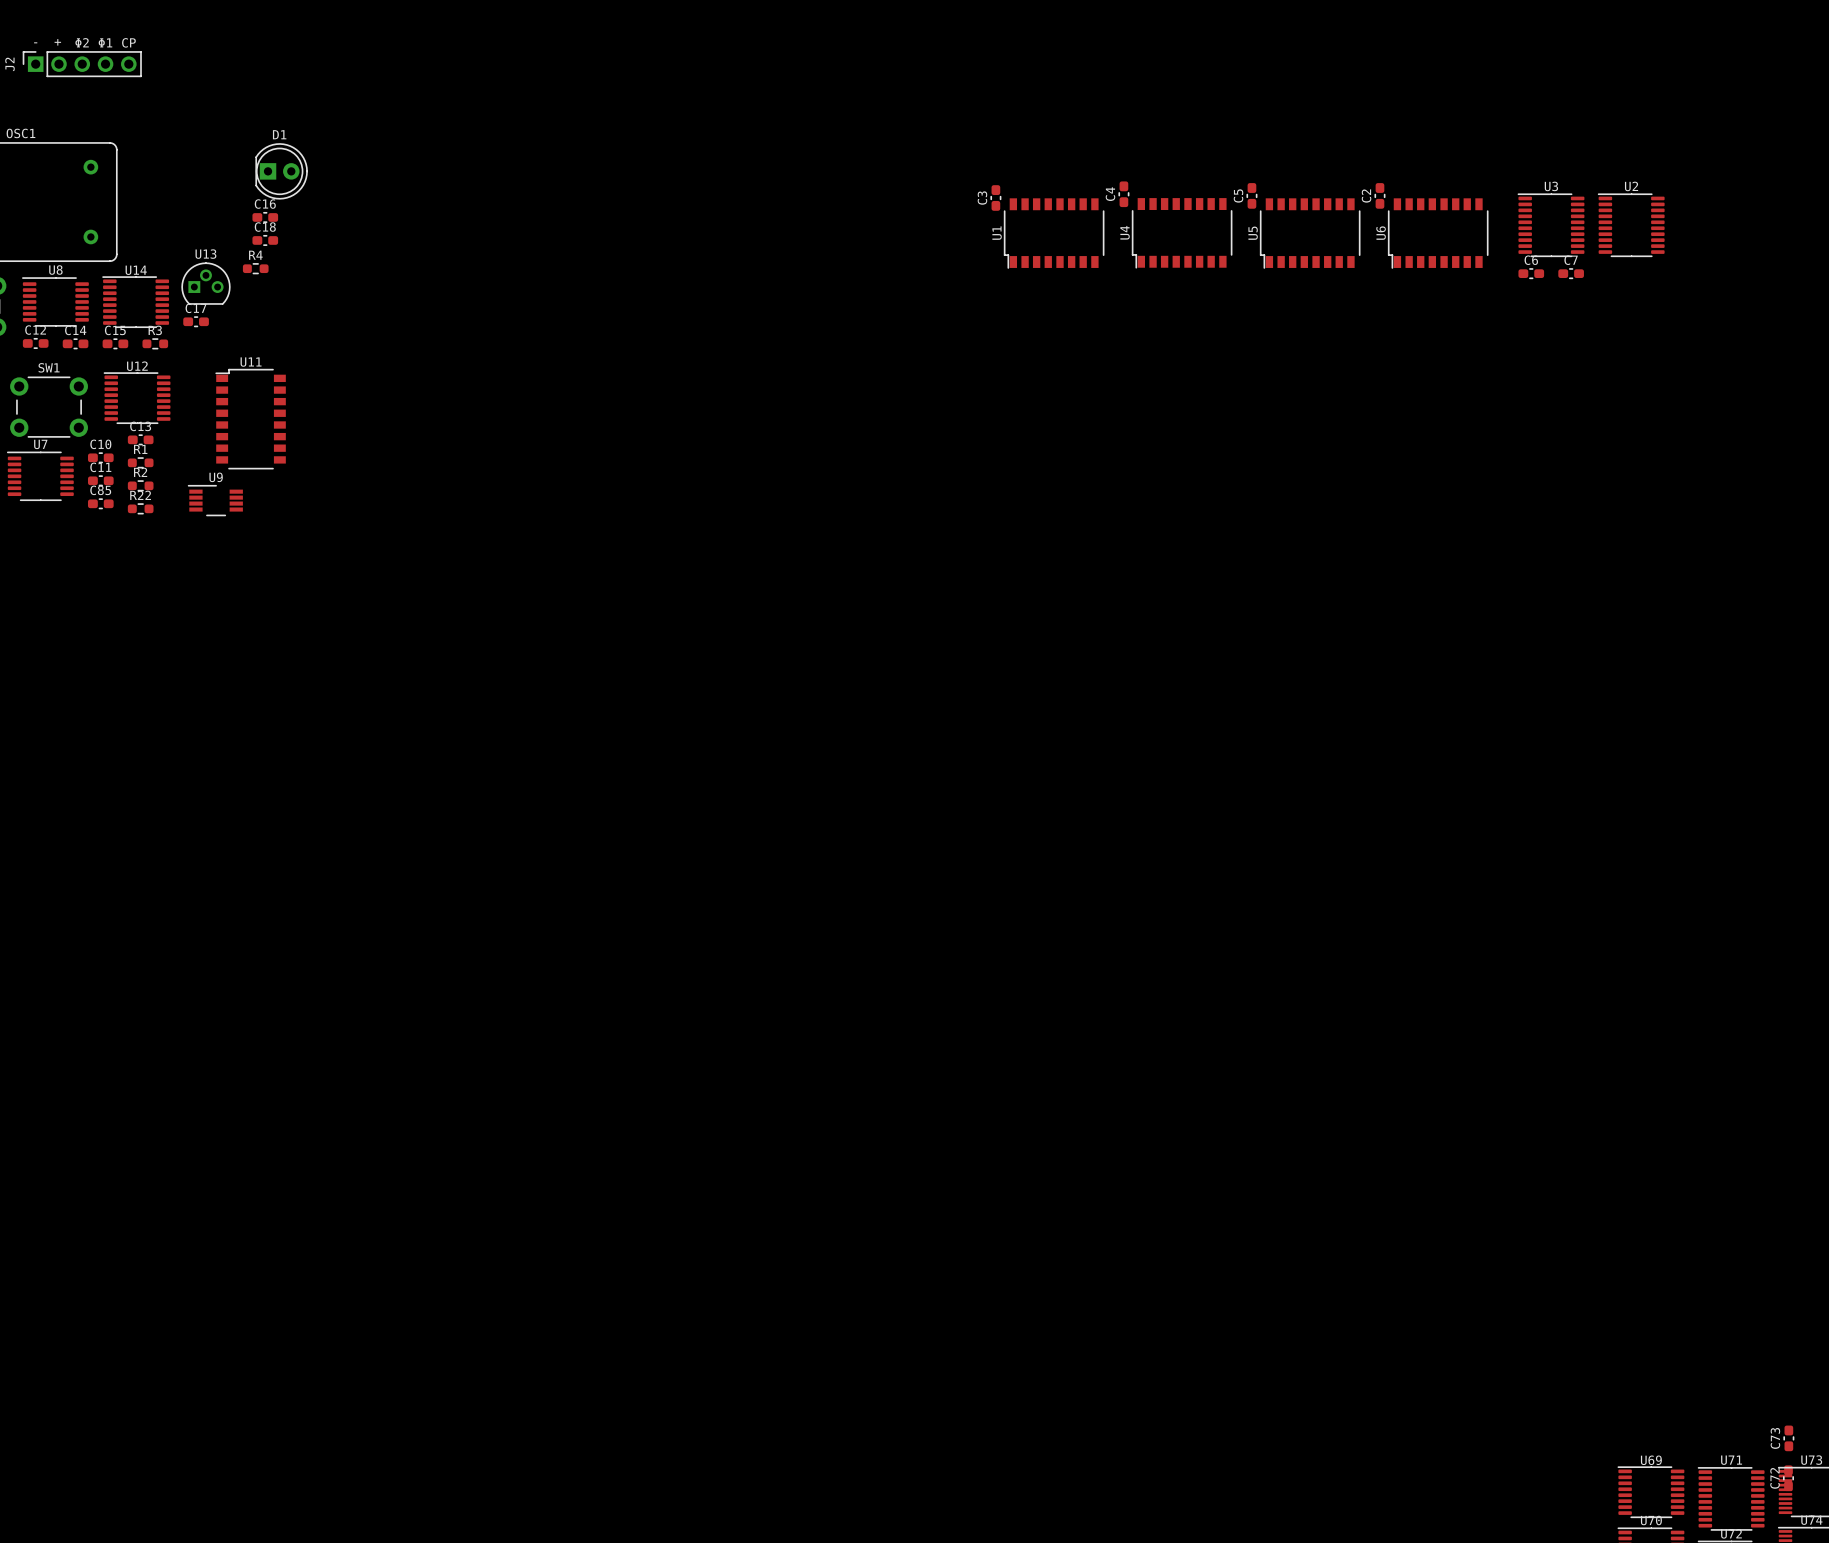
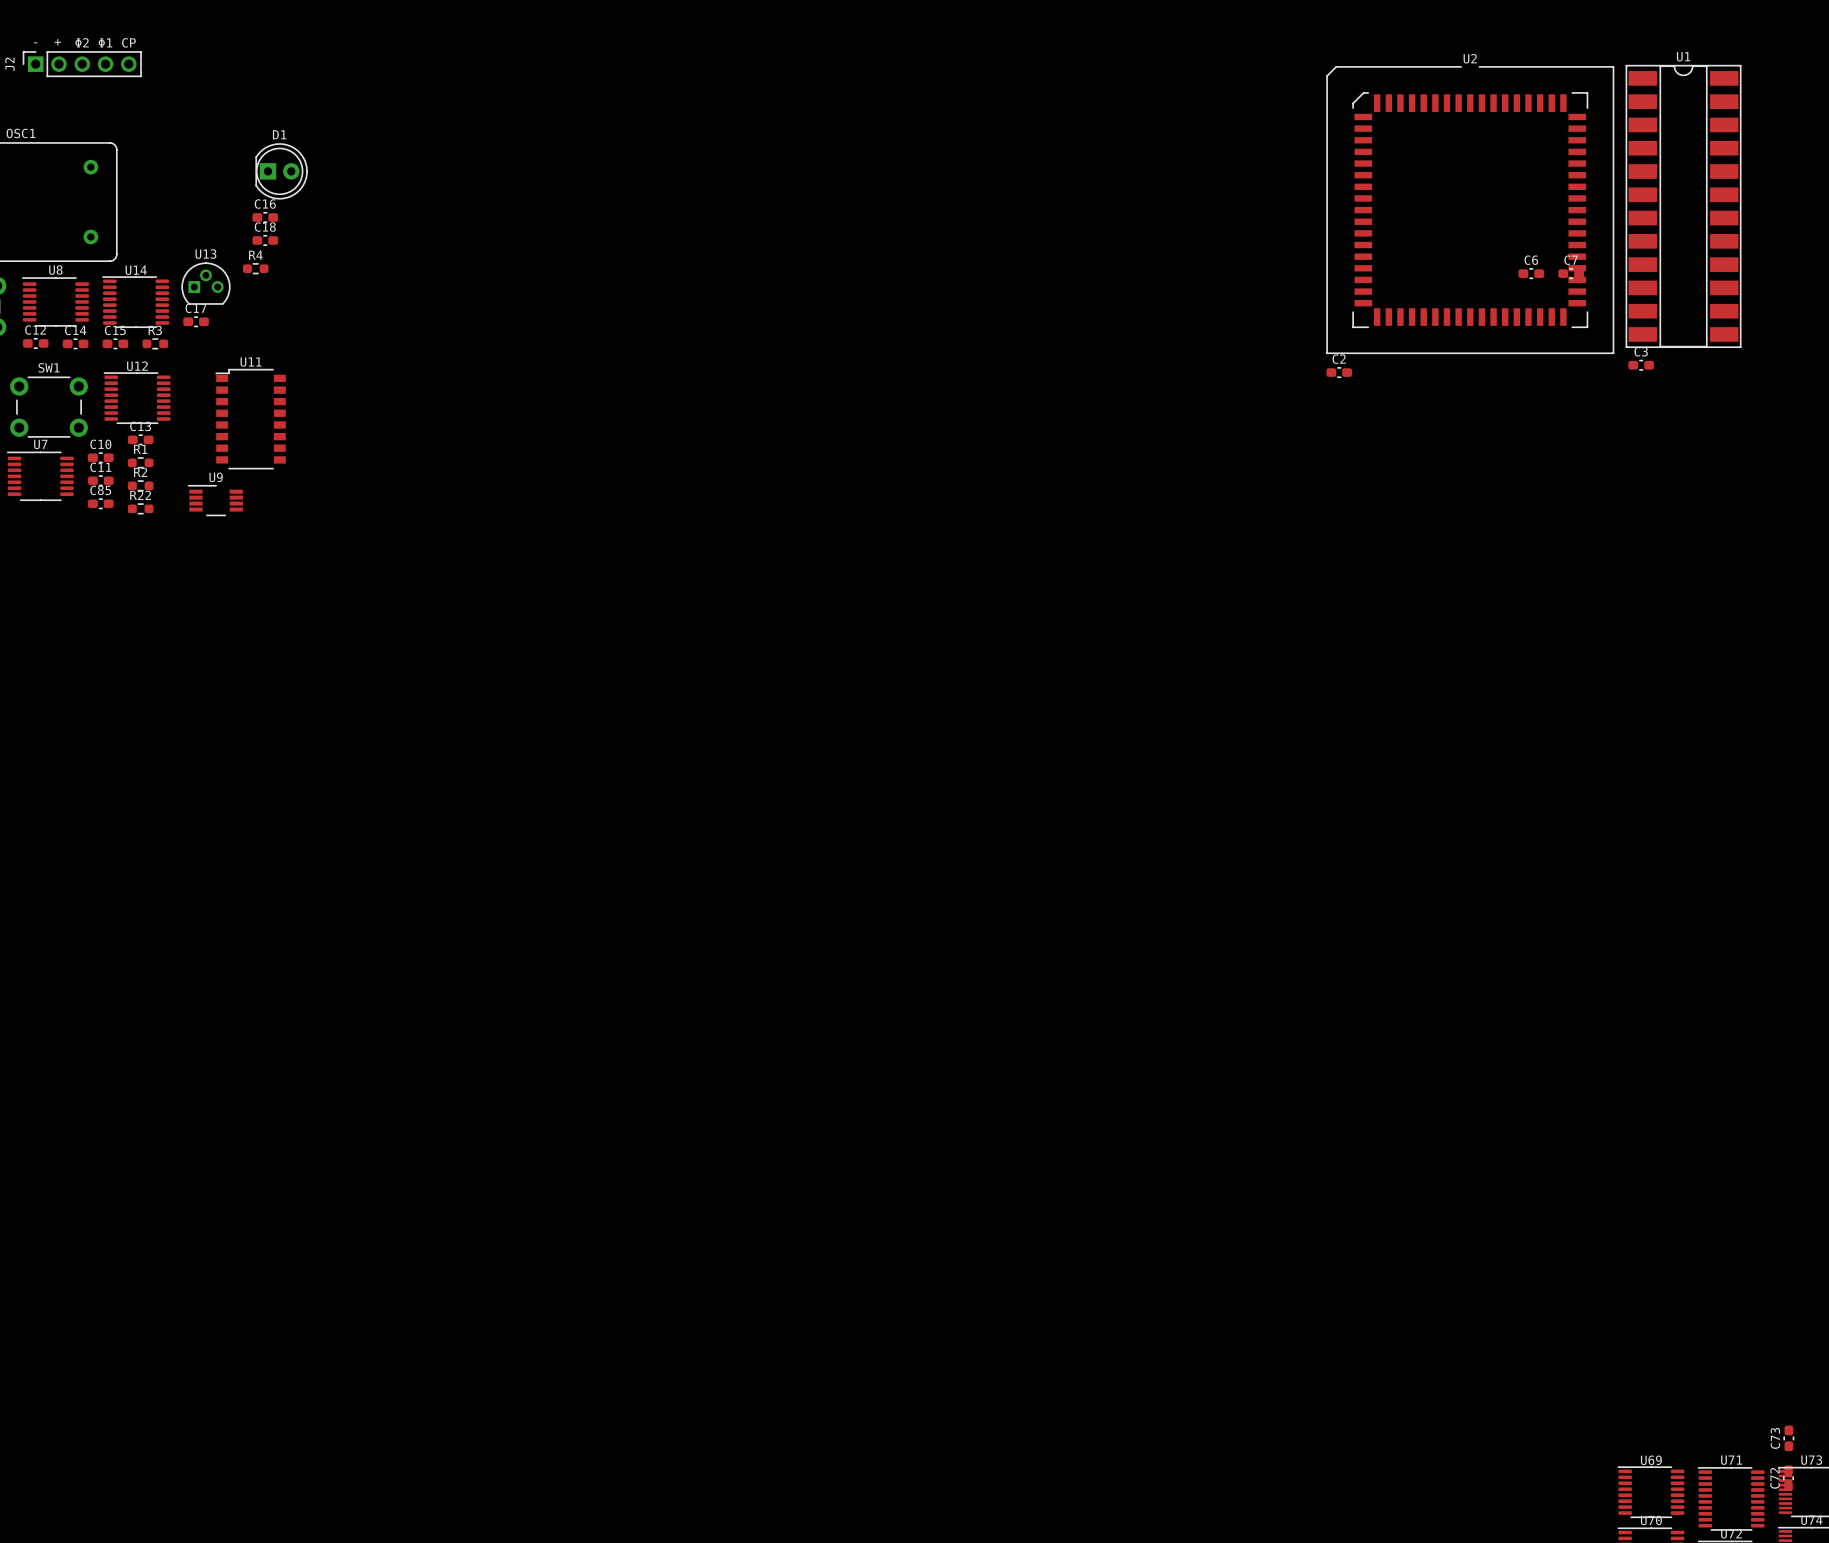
U2 name position: U2 (1631, 186) -> U2 (1470, 58)
U2 footprint: [1598, 193, 1665, 257] -> [1326, 66, 1615, 354]
C4: (1123, 194) -> none
C5: (1251, 195) -> none
C2 rotation: 0° (1379, 195) -> 90° clockwise (1339, 372)
C2 position: (1379, 195) -> (1339, 372)
C3 rotation: 0° (995, 197) -> 90° clockwise (1641, 365)
C3 position: (995, 197) -> (1641, 365)
U1 footprint: [1004, 198, 1105, 269] -> [1625, 65, 1742, 348]
U3: (1551, 225) -> none
U1 name position: U1 (997, 233) -> U1 (1683, 56)
U4: (1182, 233) -> none
U5: (1310, 233) -> none
U6: (1438, 233) -> none

